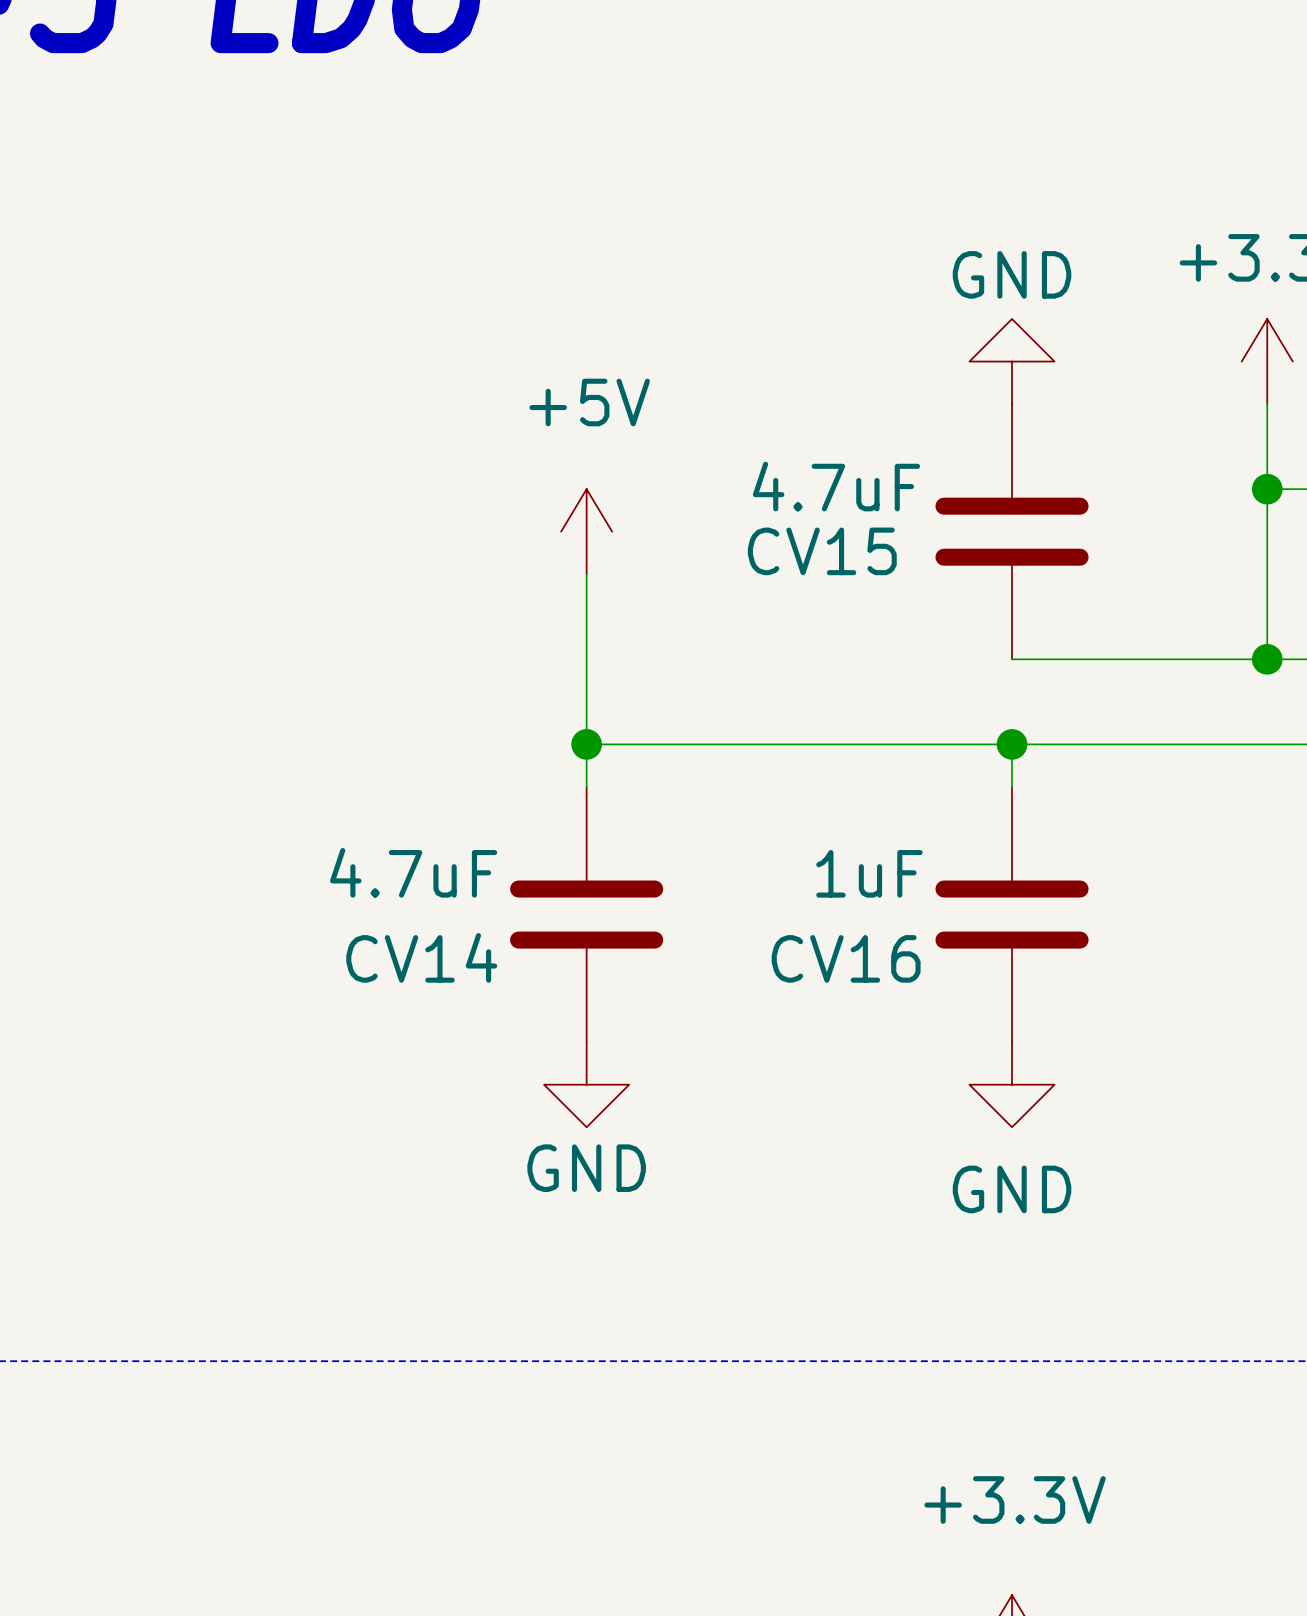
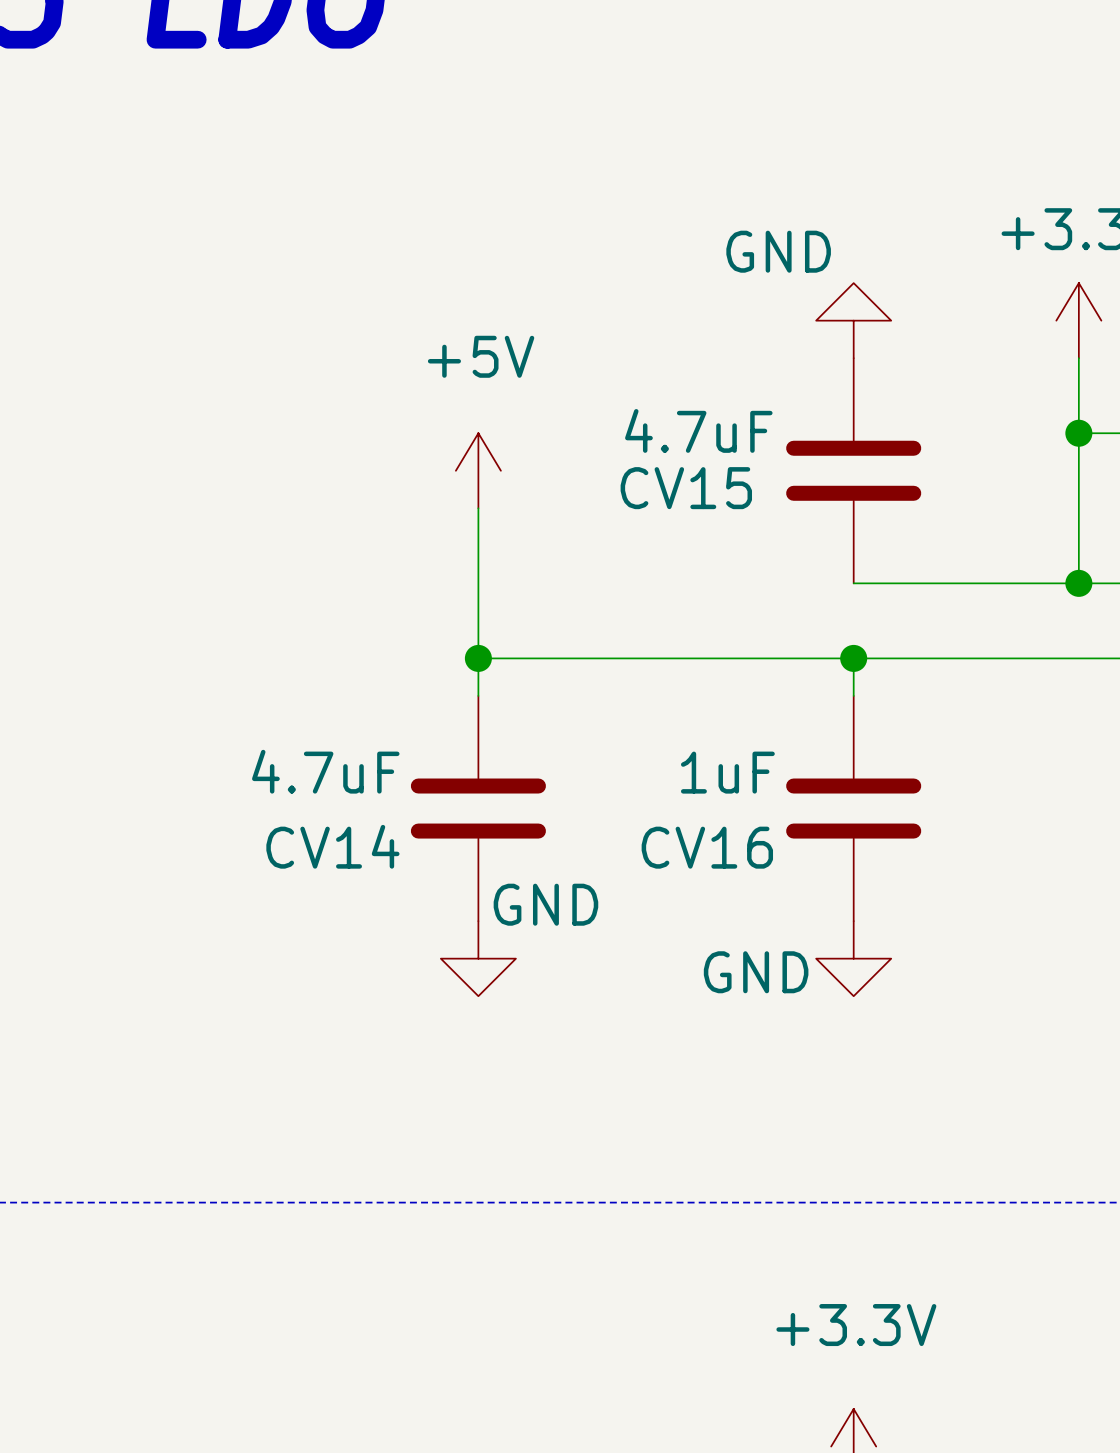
power symbol text position: GND (1012, 274) -> GND (778, 251)
power symbol text position: GND (586, 1168) -> GND (545, 904)
power symbol text position: GND (1012, 1189) -> GND (756, 972)

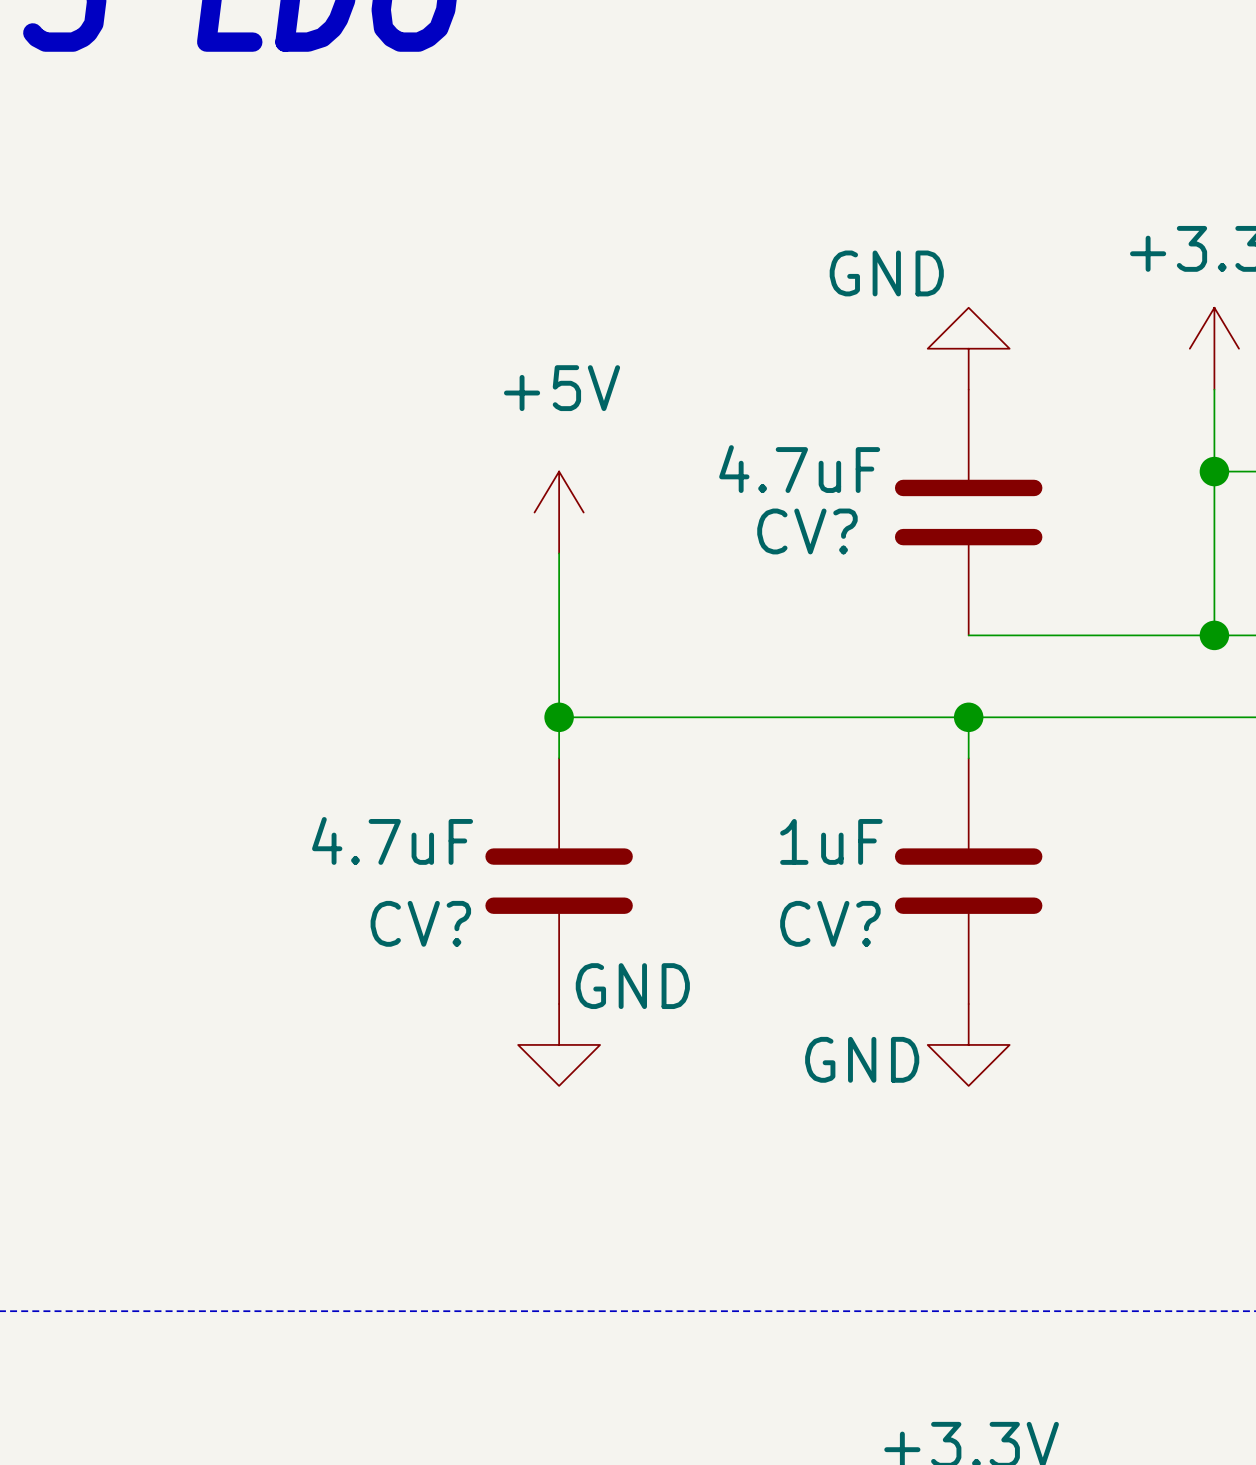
CV15 name: CV15 (686, 488) -> CV? (807, 531)
CV14 name: CV14 (332, 846) -> CV? (420, 923)
CV16 name: CV16 (707, 847) -> CV? (830, 923)

